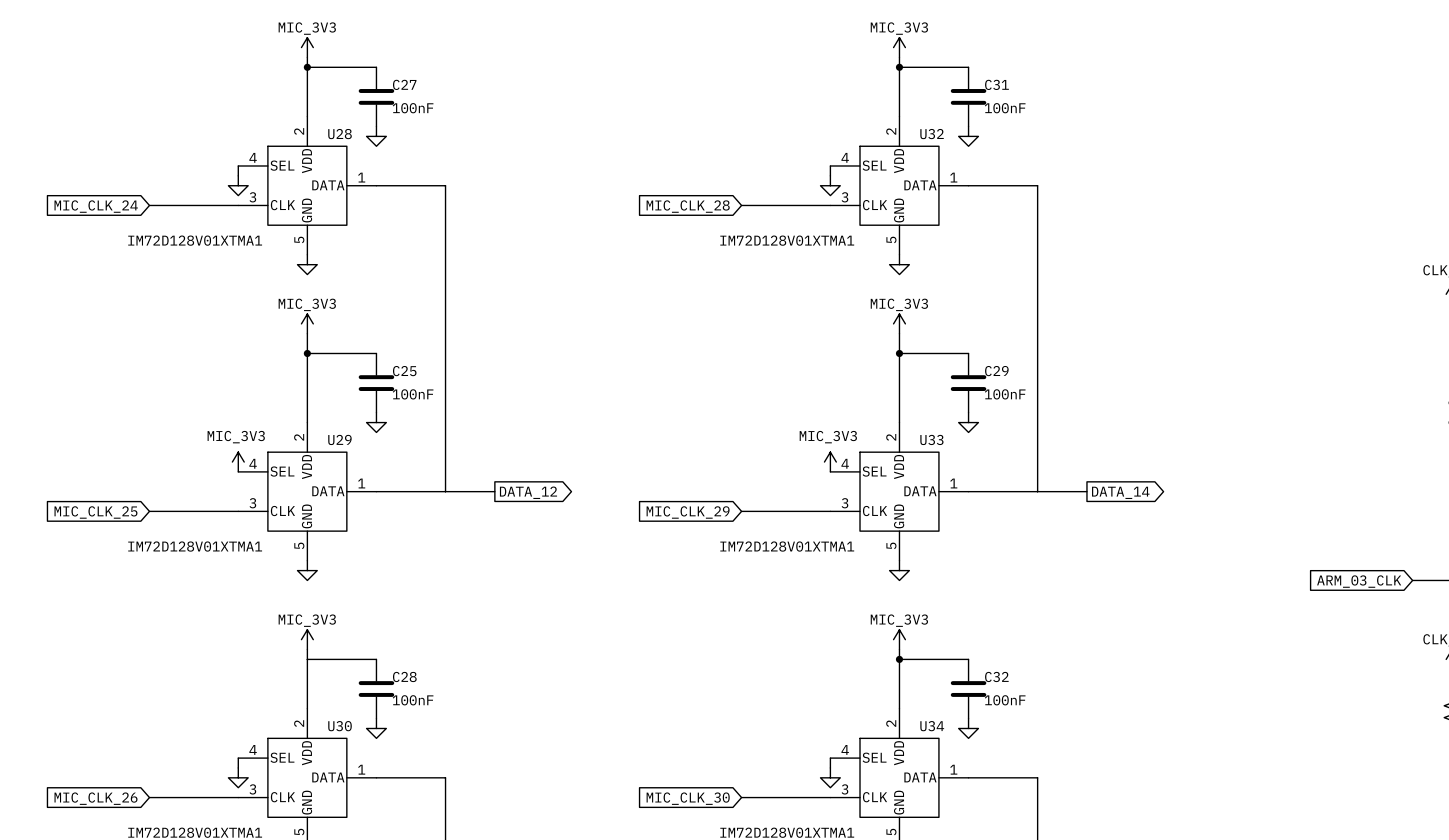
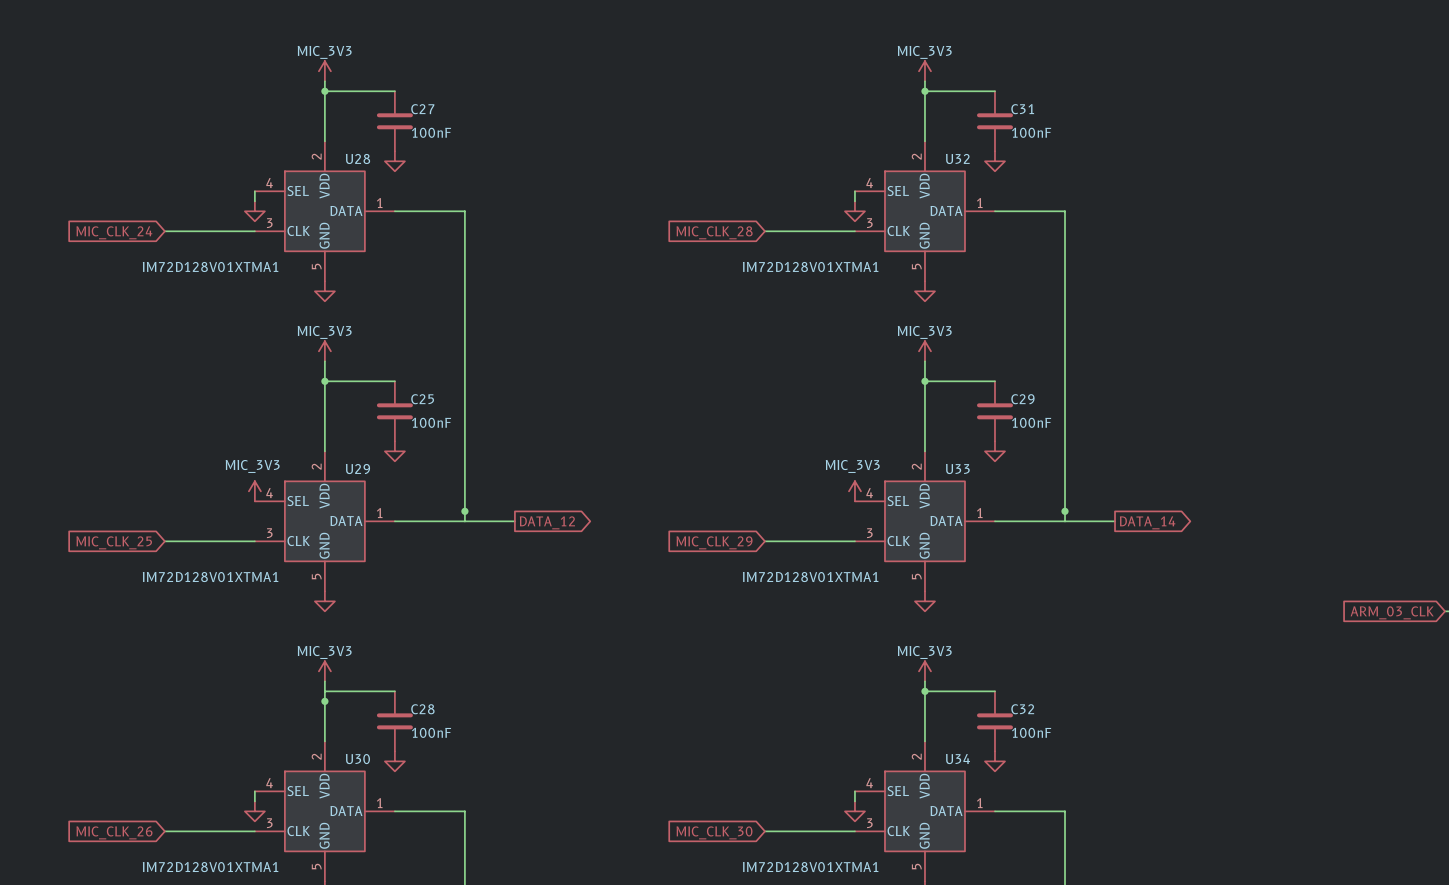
junction: none -> (464, 511)
junction: none -> (1065, 511)
junction: none -> (324, 701)

